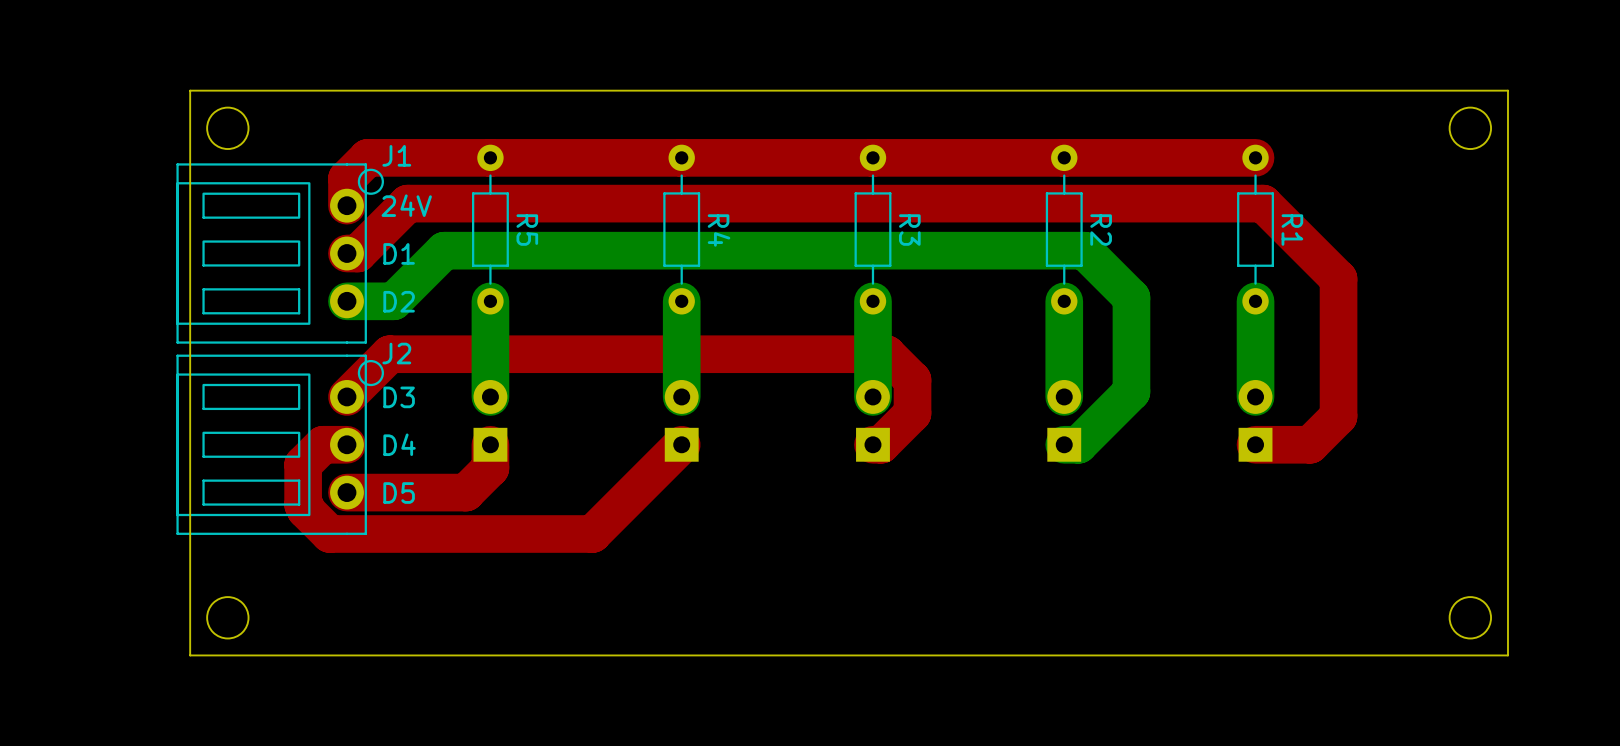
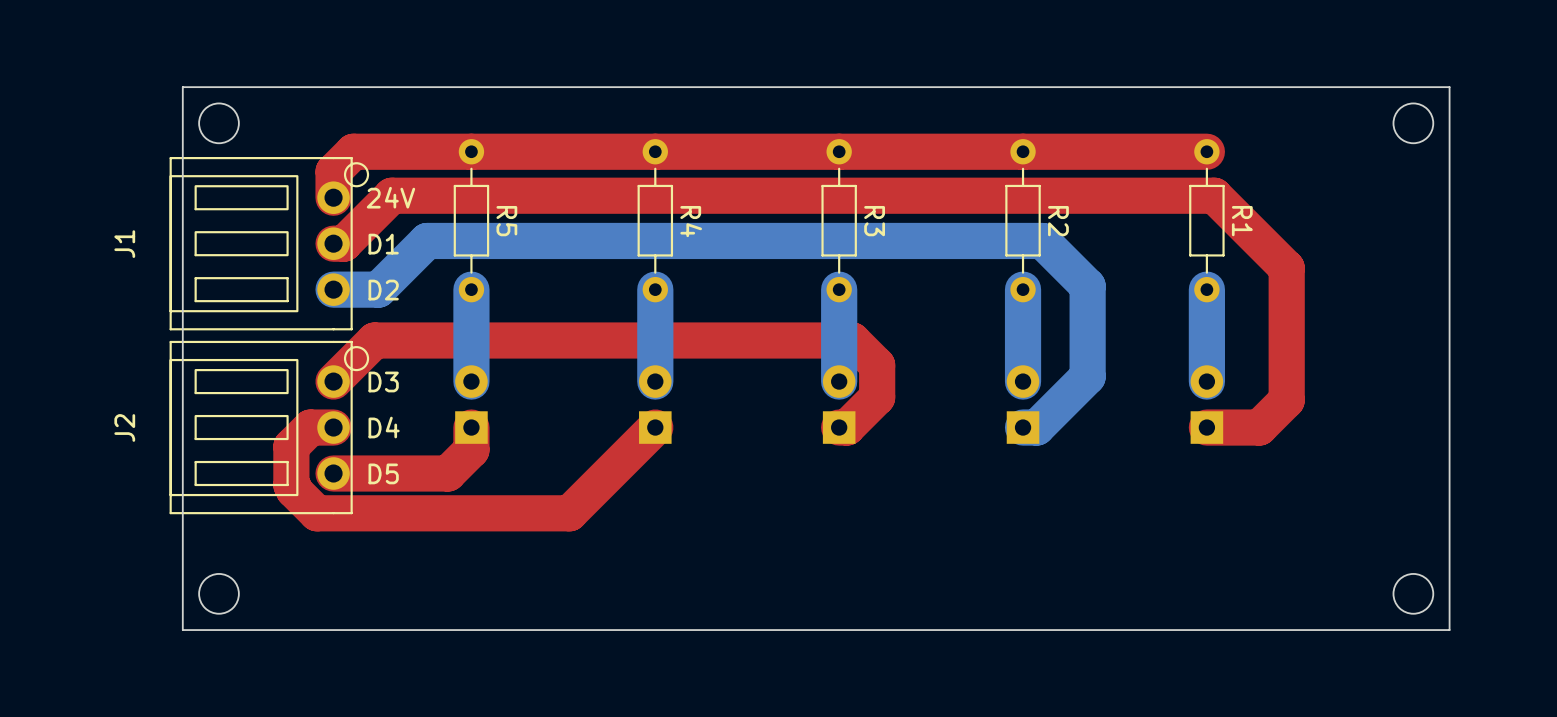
J1 name rotation: 0° (396, 155) -> 90° counterclockwise (124, 244)
J1 name position: J1 (396, 155) -> J1 (124, 244)
J2 name rotation: 0° (396, 353) -> 90° counterclockwise (124, 427)
J2 name position: J2 (396, 353) -> J2 (124, 427)

